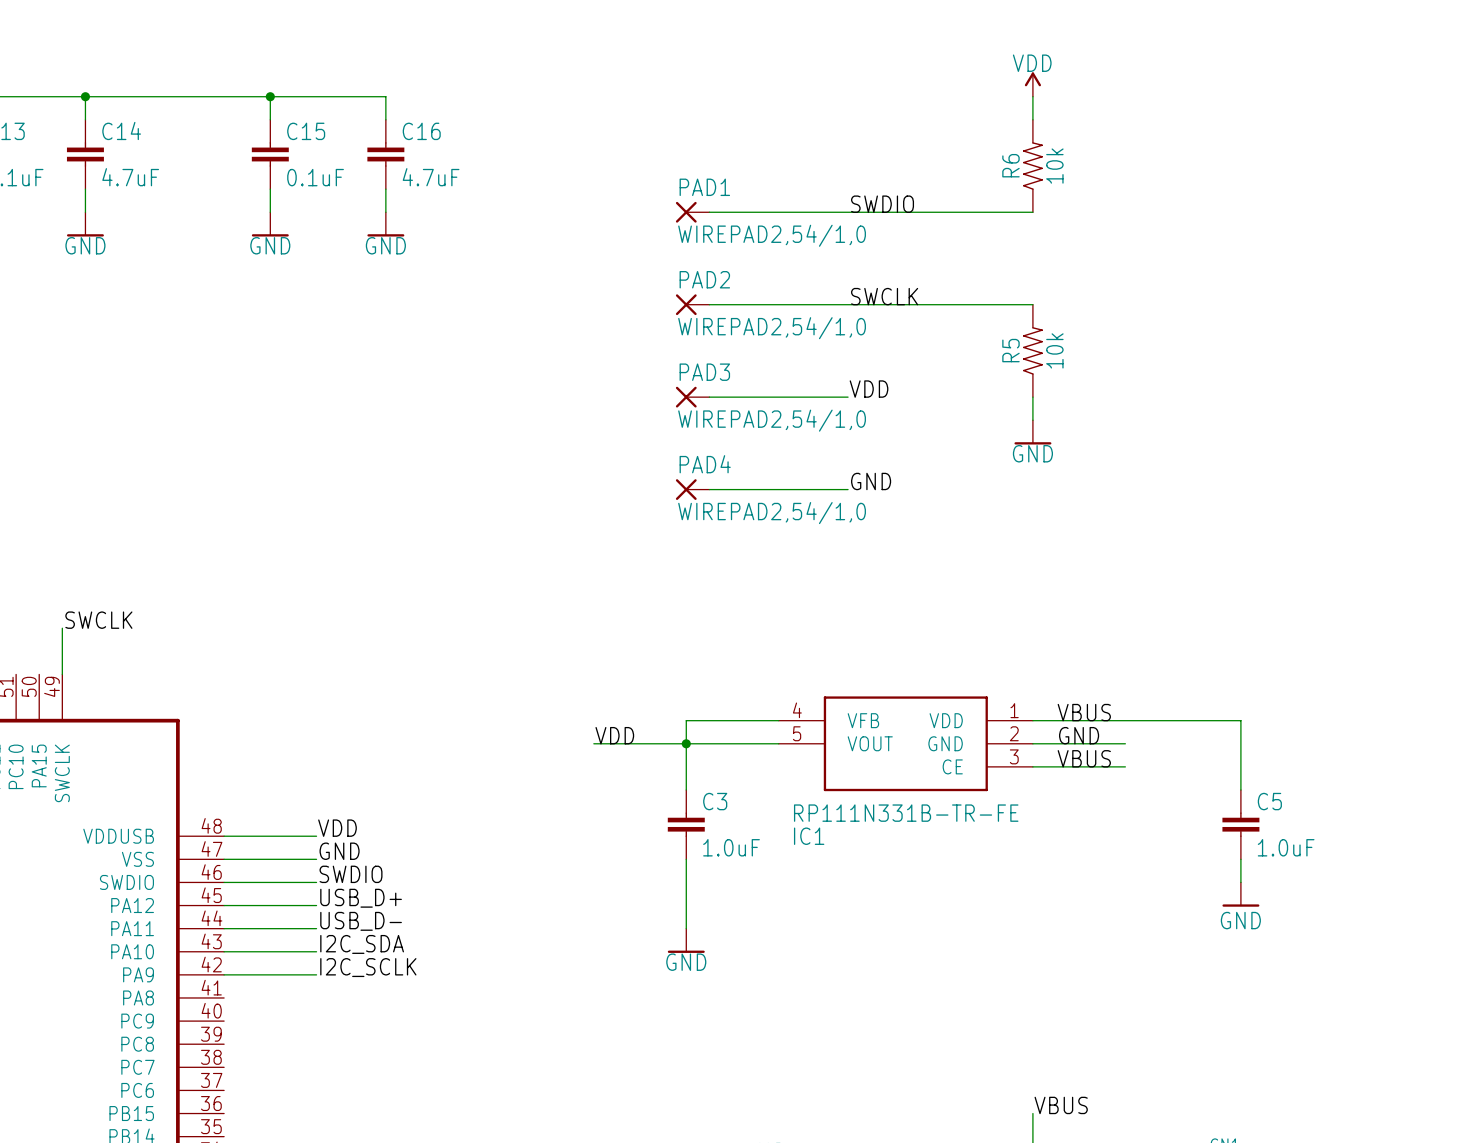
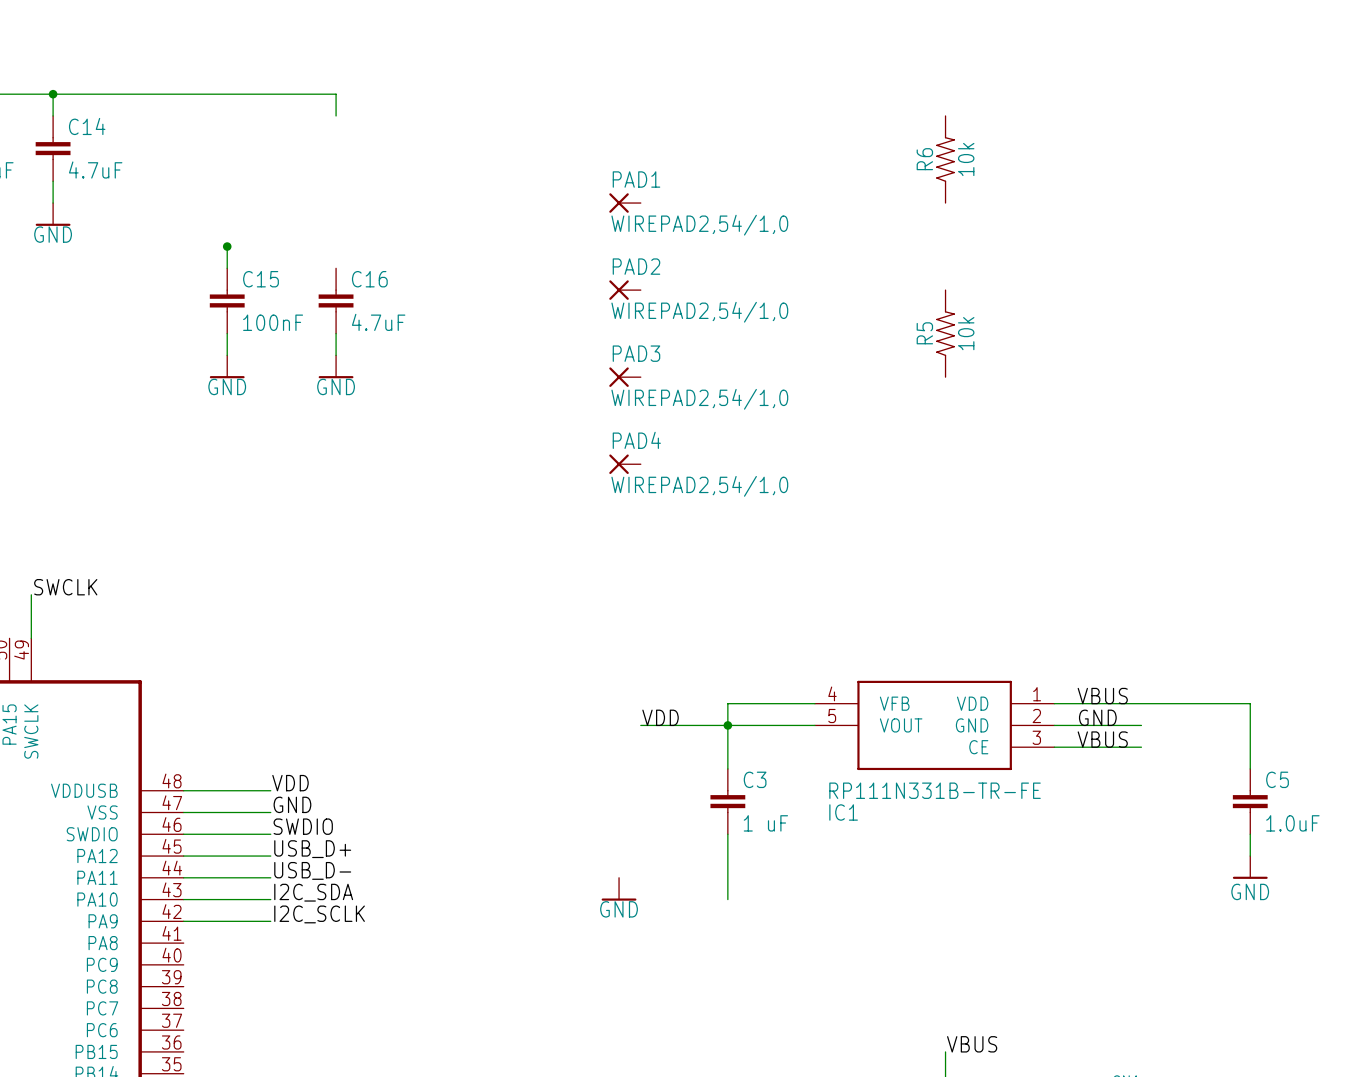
power symbol: VDD (1032, 84) -> none
wire: (270, 96) (270, 119) -> (227, 246) (227, 268)
junction: (270, 96) -> none
wire: (1032, 96) (1032, 119) -> none
C15 position: (270, 154) -> (227, 300)
C16 position: (385, 154) -> (336, 300)
C15 value: 0.1uF (315, 177) -> 100nF (273, 322)
wire: (270, 189) (270, 212) -> (227, 333) (227, 355)
wire: (385, 189) (385, 212) -> (336, 333) (336, 355)
label: SWDIO (882, 204) -> none
wire: (709, 212) (1032, 212) -> none
power symbol: GND (270, 224) -> none
power symbol: GND (385, 224) -> none
junction: none -> (227, 246)
label: SWCLK (884, 296) -> none
wire: (709, 304) (1032, 304) -> none
power symbol: none -> GND (227, 366)
power symbol: none -> GND (336, 366)
label: VDD (869, 389) -> none
wire: (709, 397) (848, 397) -> none
wire: (1032, 397) (1032, 420) -> none
power symbol: GND (1032, 432) -> none
label: GND (871, 481) -> none
wire: (709, 489) (848, 489) -> none
label: VBUS (1084, 712) -> none
wire: (778, 720) (686, 720) (686, 790) -> (814, 703) (727, 703) (727, 768)
wire: (1032, 720) (1240, 720) (1240, 790) -> (1054, 747) (1141, 747)
label position: VDD (614, 735) -> VDD (660, 717)
label position: GND (1079, 735) -> GND (1097, 717)
label: none -> VBUS (1102, 696)
wire: (593, 743) (778, 743) -> (640, 725) (814, 725)
junction: (686, 743) -> none
IC1 position: (905, 743) -> (934, 725)
wire: (1032, 743) (1125, 743) -> (1054, 725) (1141, 725)
wire: none -> (1054, 703) (1250, 703) (1250, 768)
label: VBUS (1084, 758) -> none
junction: none -> (727, 725)
wire: (1032, 766) (1125, 766) -> none
label: none -> VBUS (1102, 739)
C3 position: (686, 824) -> (727, 801)
C5 position: (1240, 824) -> (1250, 801)
C3 value: 1.0uF (731, 847) -> 1 uF (765, 823)
wire: (686, 859) (686, 928) -> (727, 834) (727, 899)
wire: (1240, 859) (1240, 882) -> (1250, 834) (1250, 856)
power symbol position: GND (1240, 894) -> GND (1250, 867)

